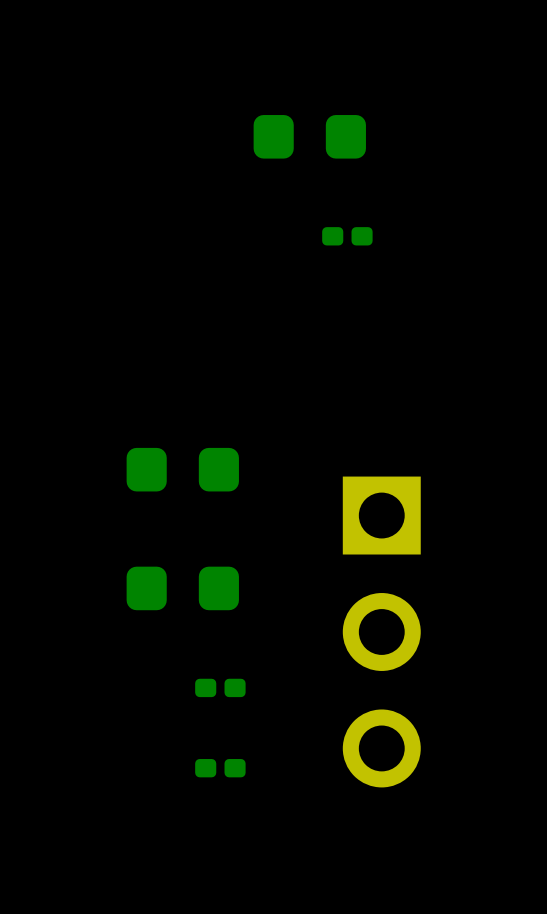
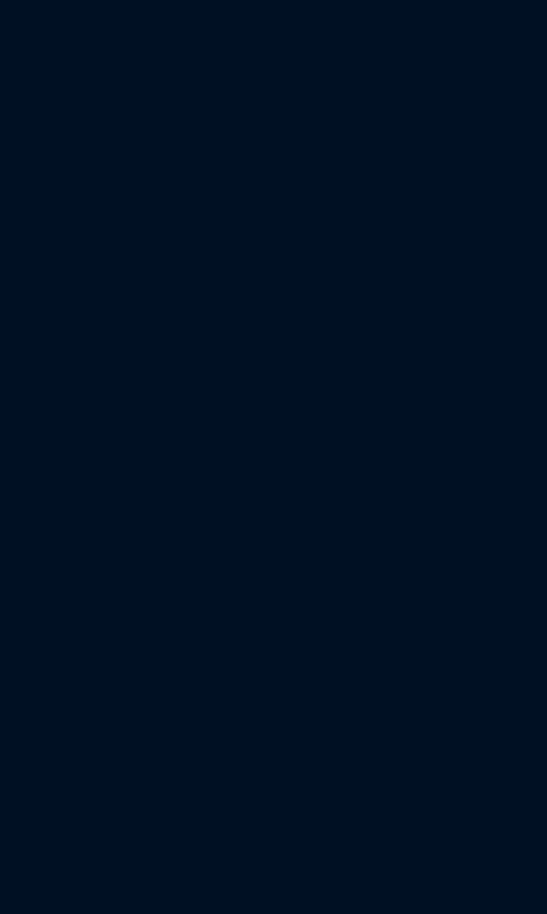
part: (309, 136) -> none
part: (347, 236) -> none
part: (182, 469) -> none
part: (182, 588) -> none
part: (381, 631) -> none
part: (220, 687) -> none
part: (220, 768) -> none

